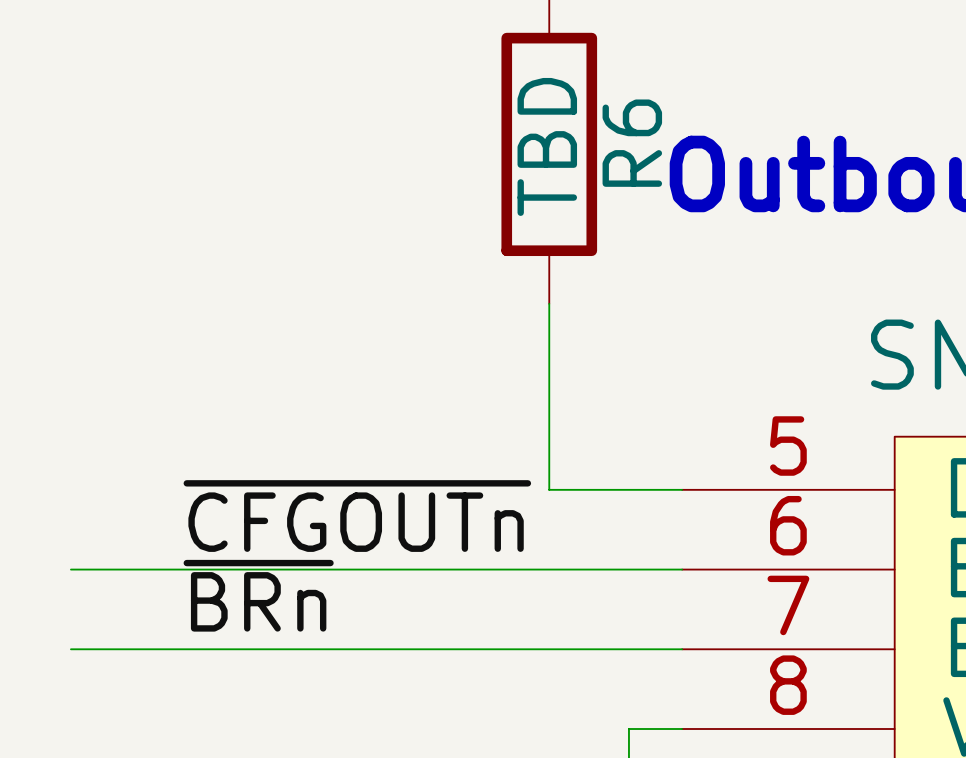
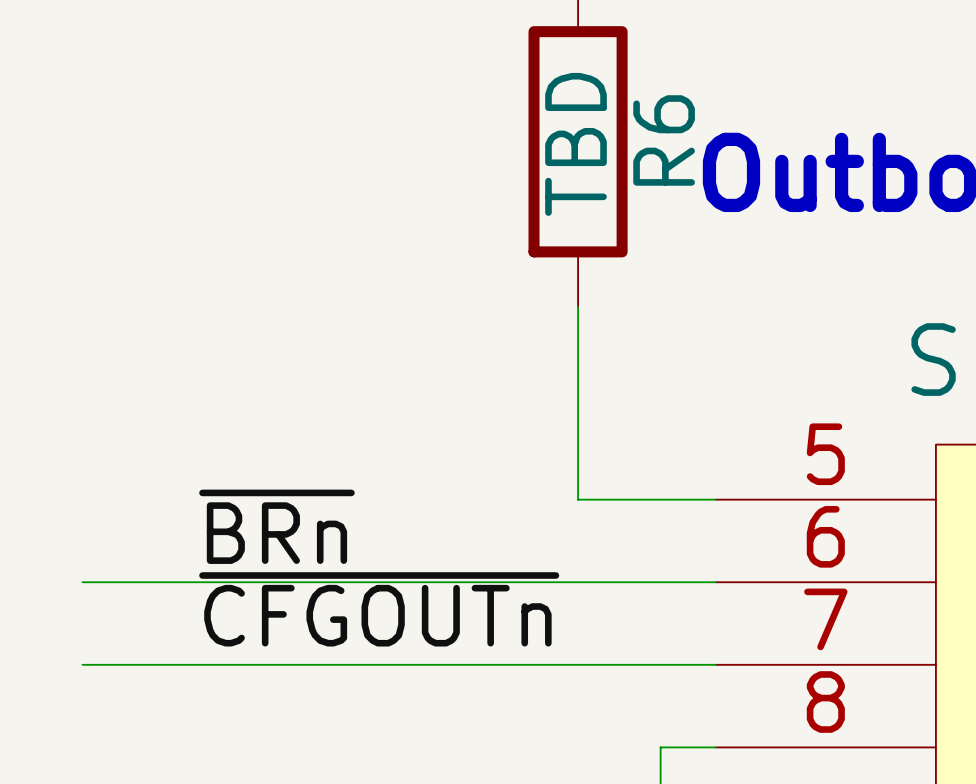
label: ~{CFGOUTn} (357, 516) -> ~{BRn} (276, 526)
label: ~{BRn} (258, 595) -> ~{CFGOUTn} (379, 609)

